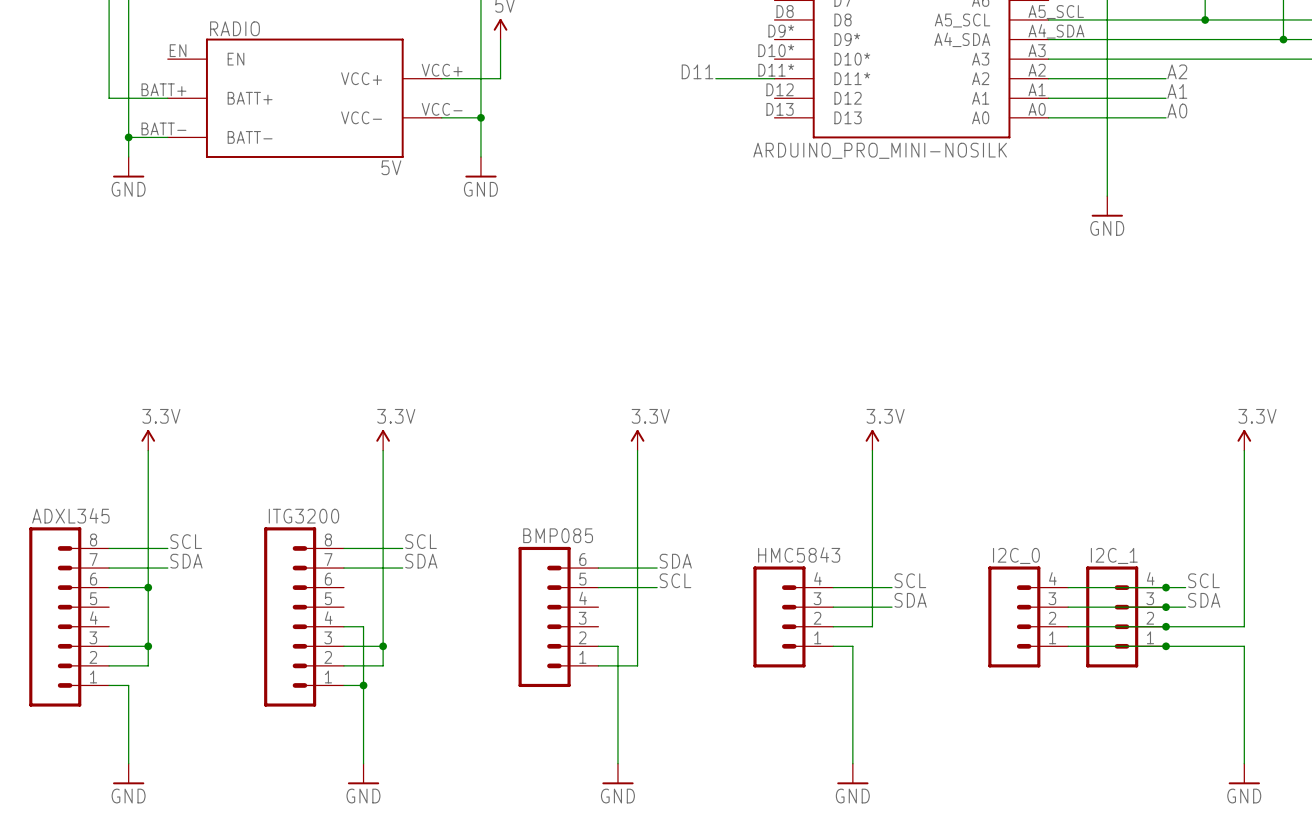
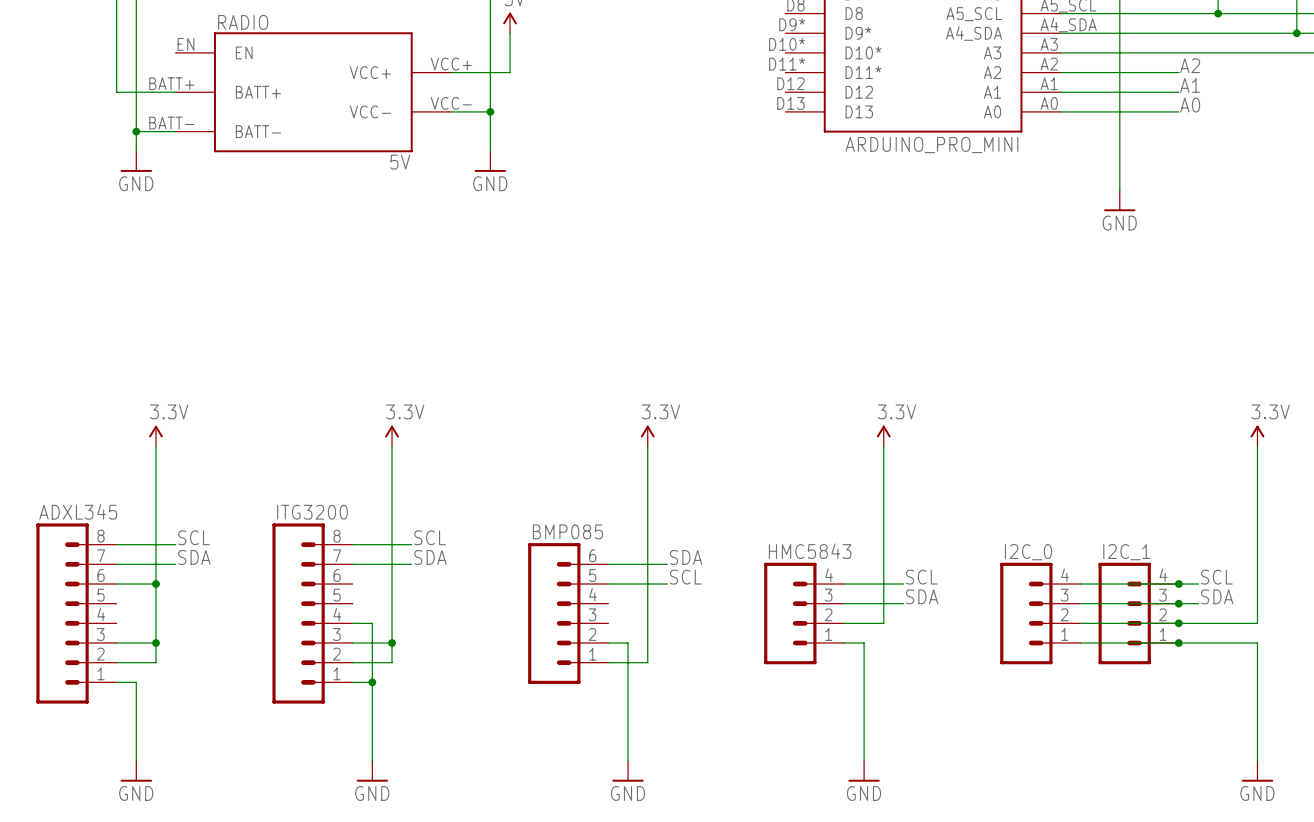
label: D11 (697, 71) -> none
wire: (715, 78) (774, 78) -> none
part value: ARDUINO_PRO_MINI-NOSILK (880, 150) -> ARDUINO_PRO_MINI (931, 145)

